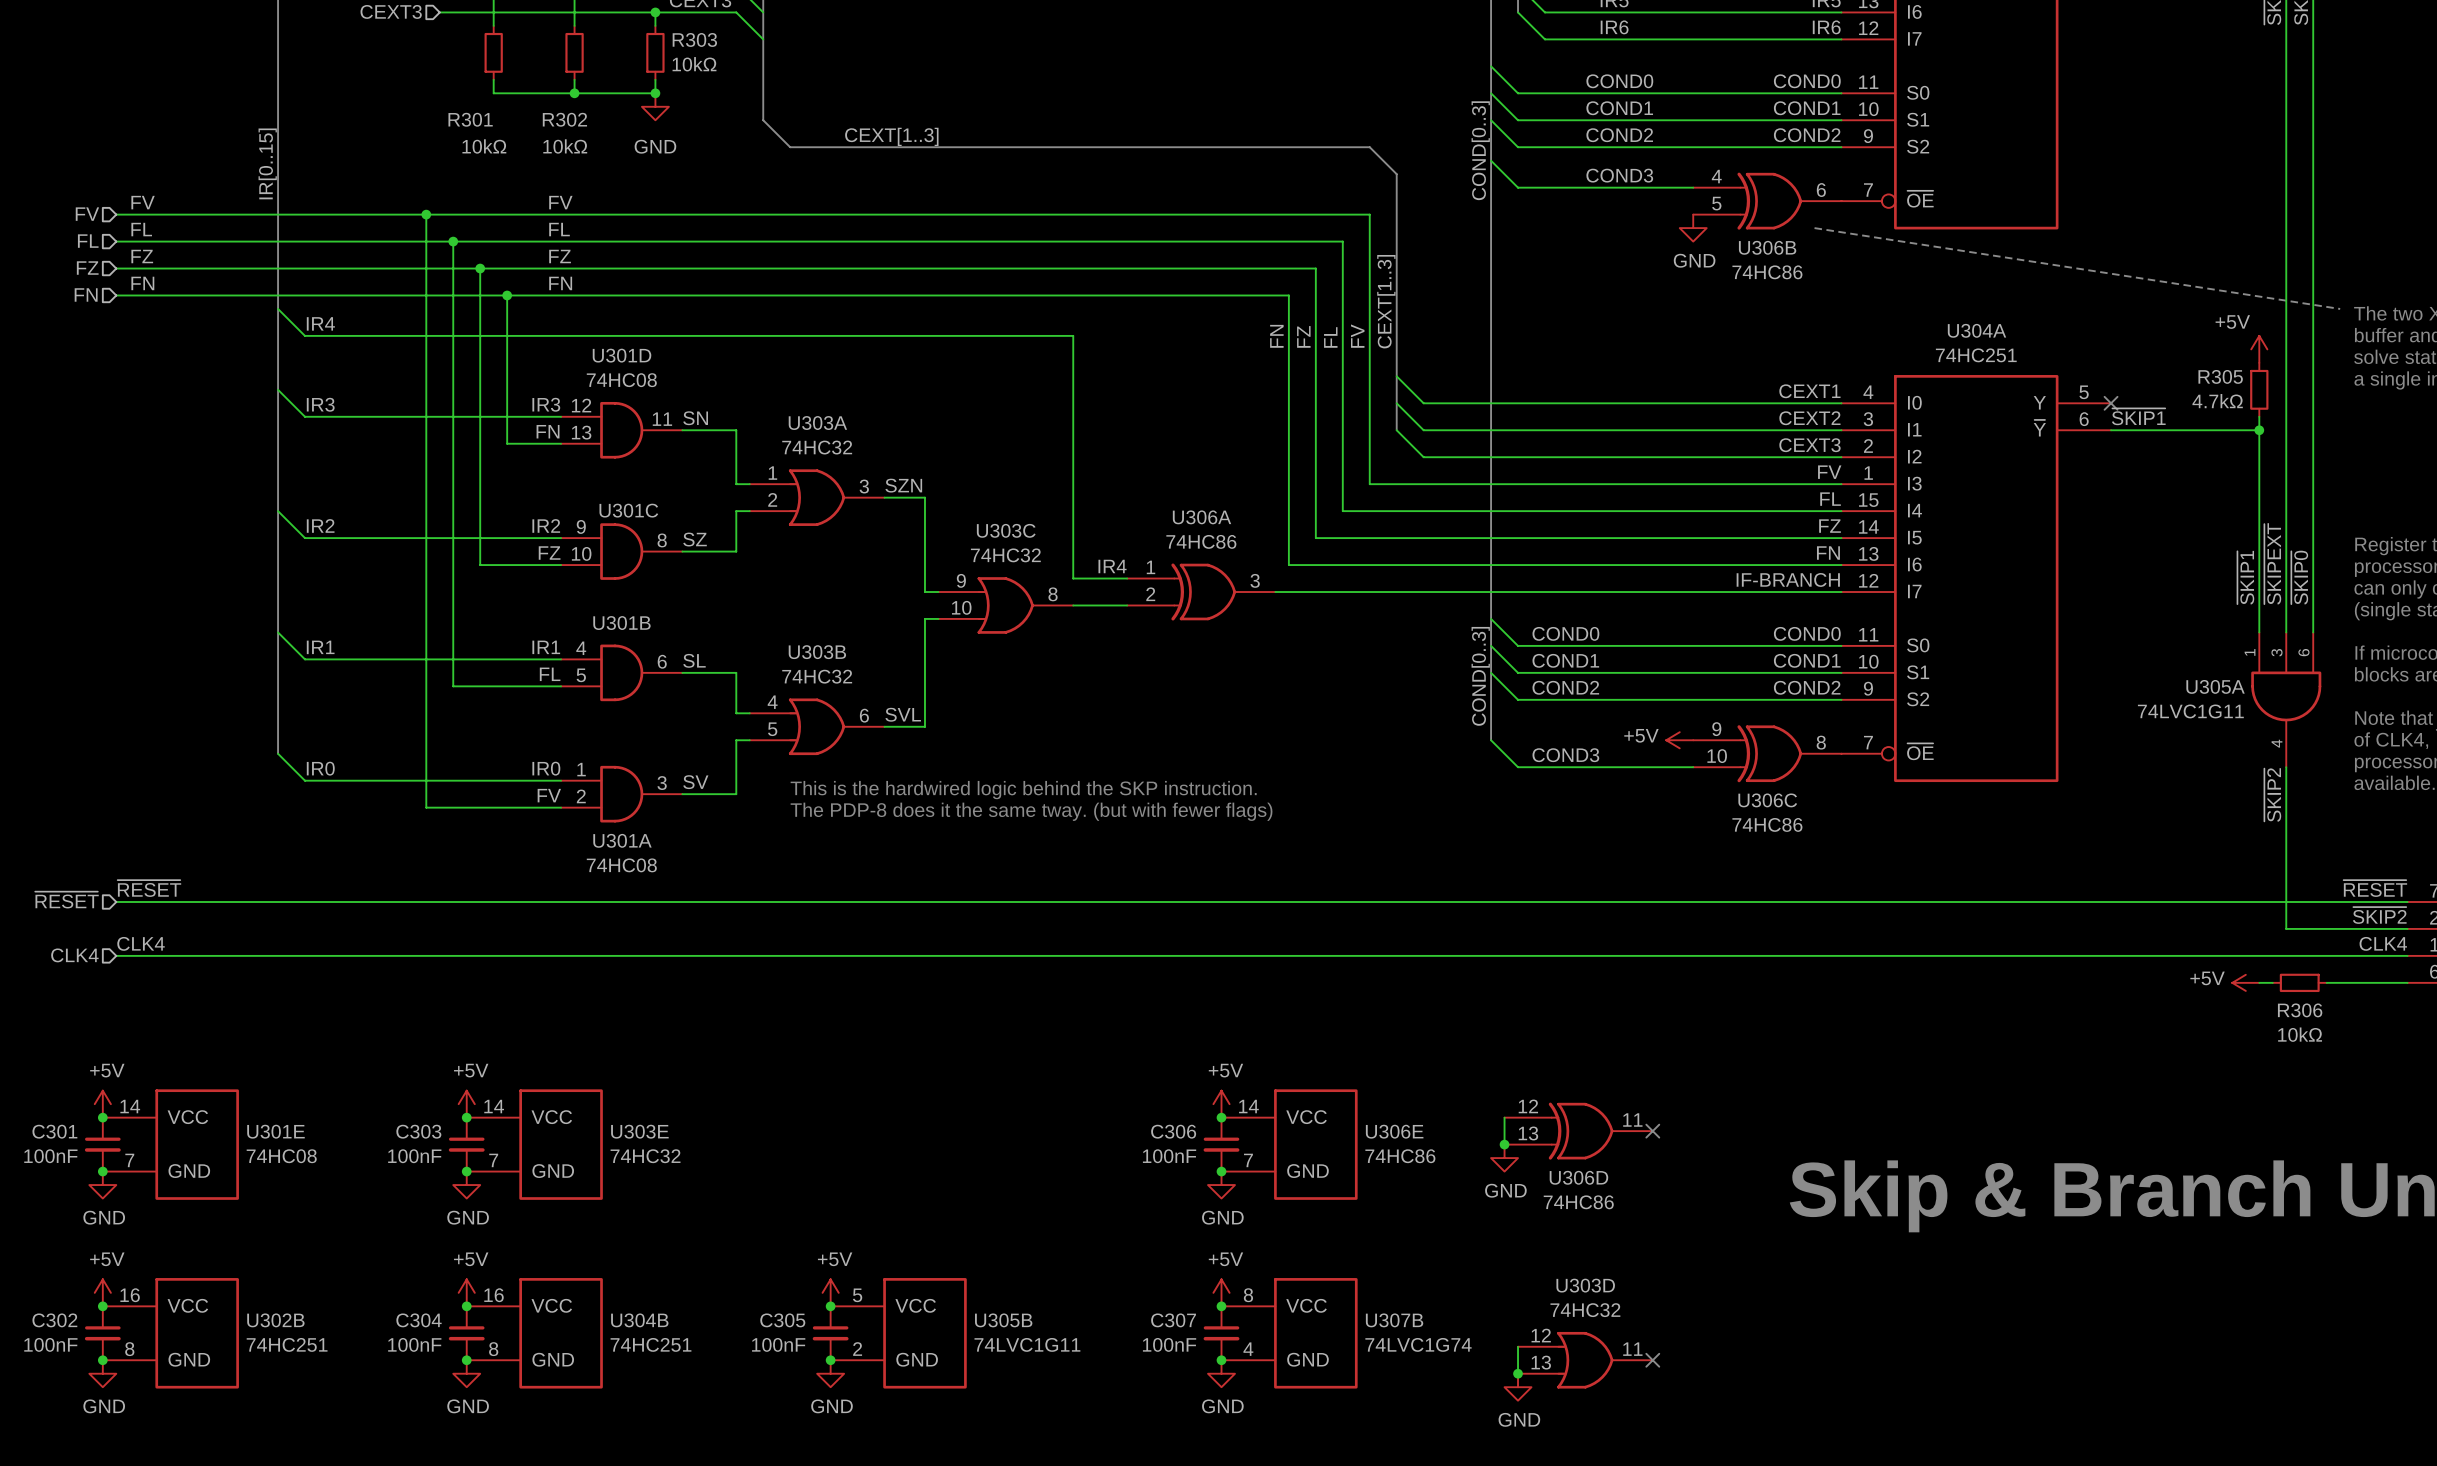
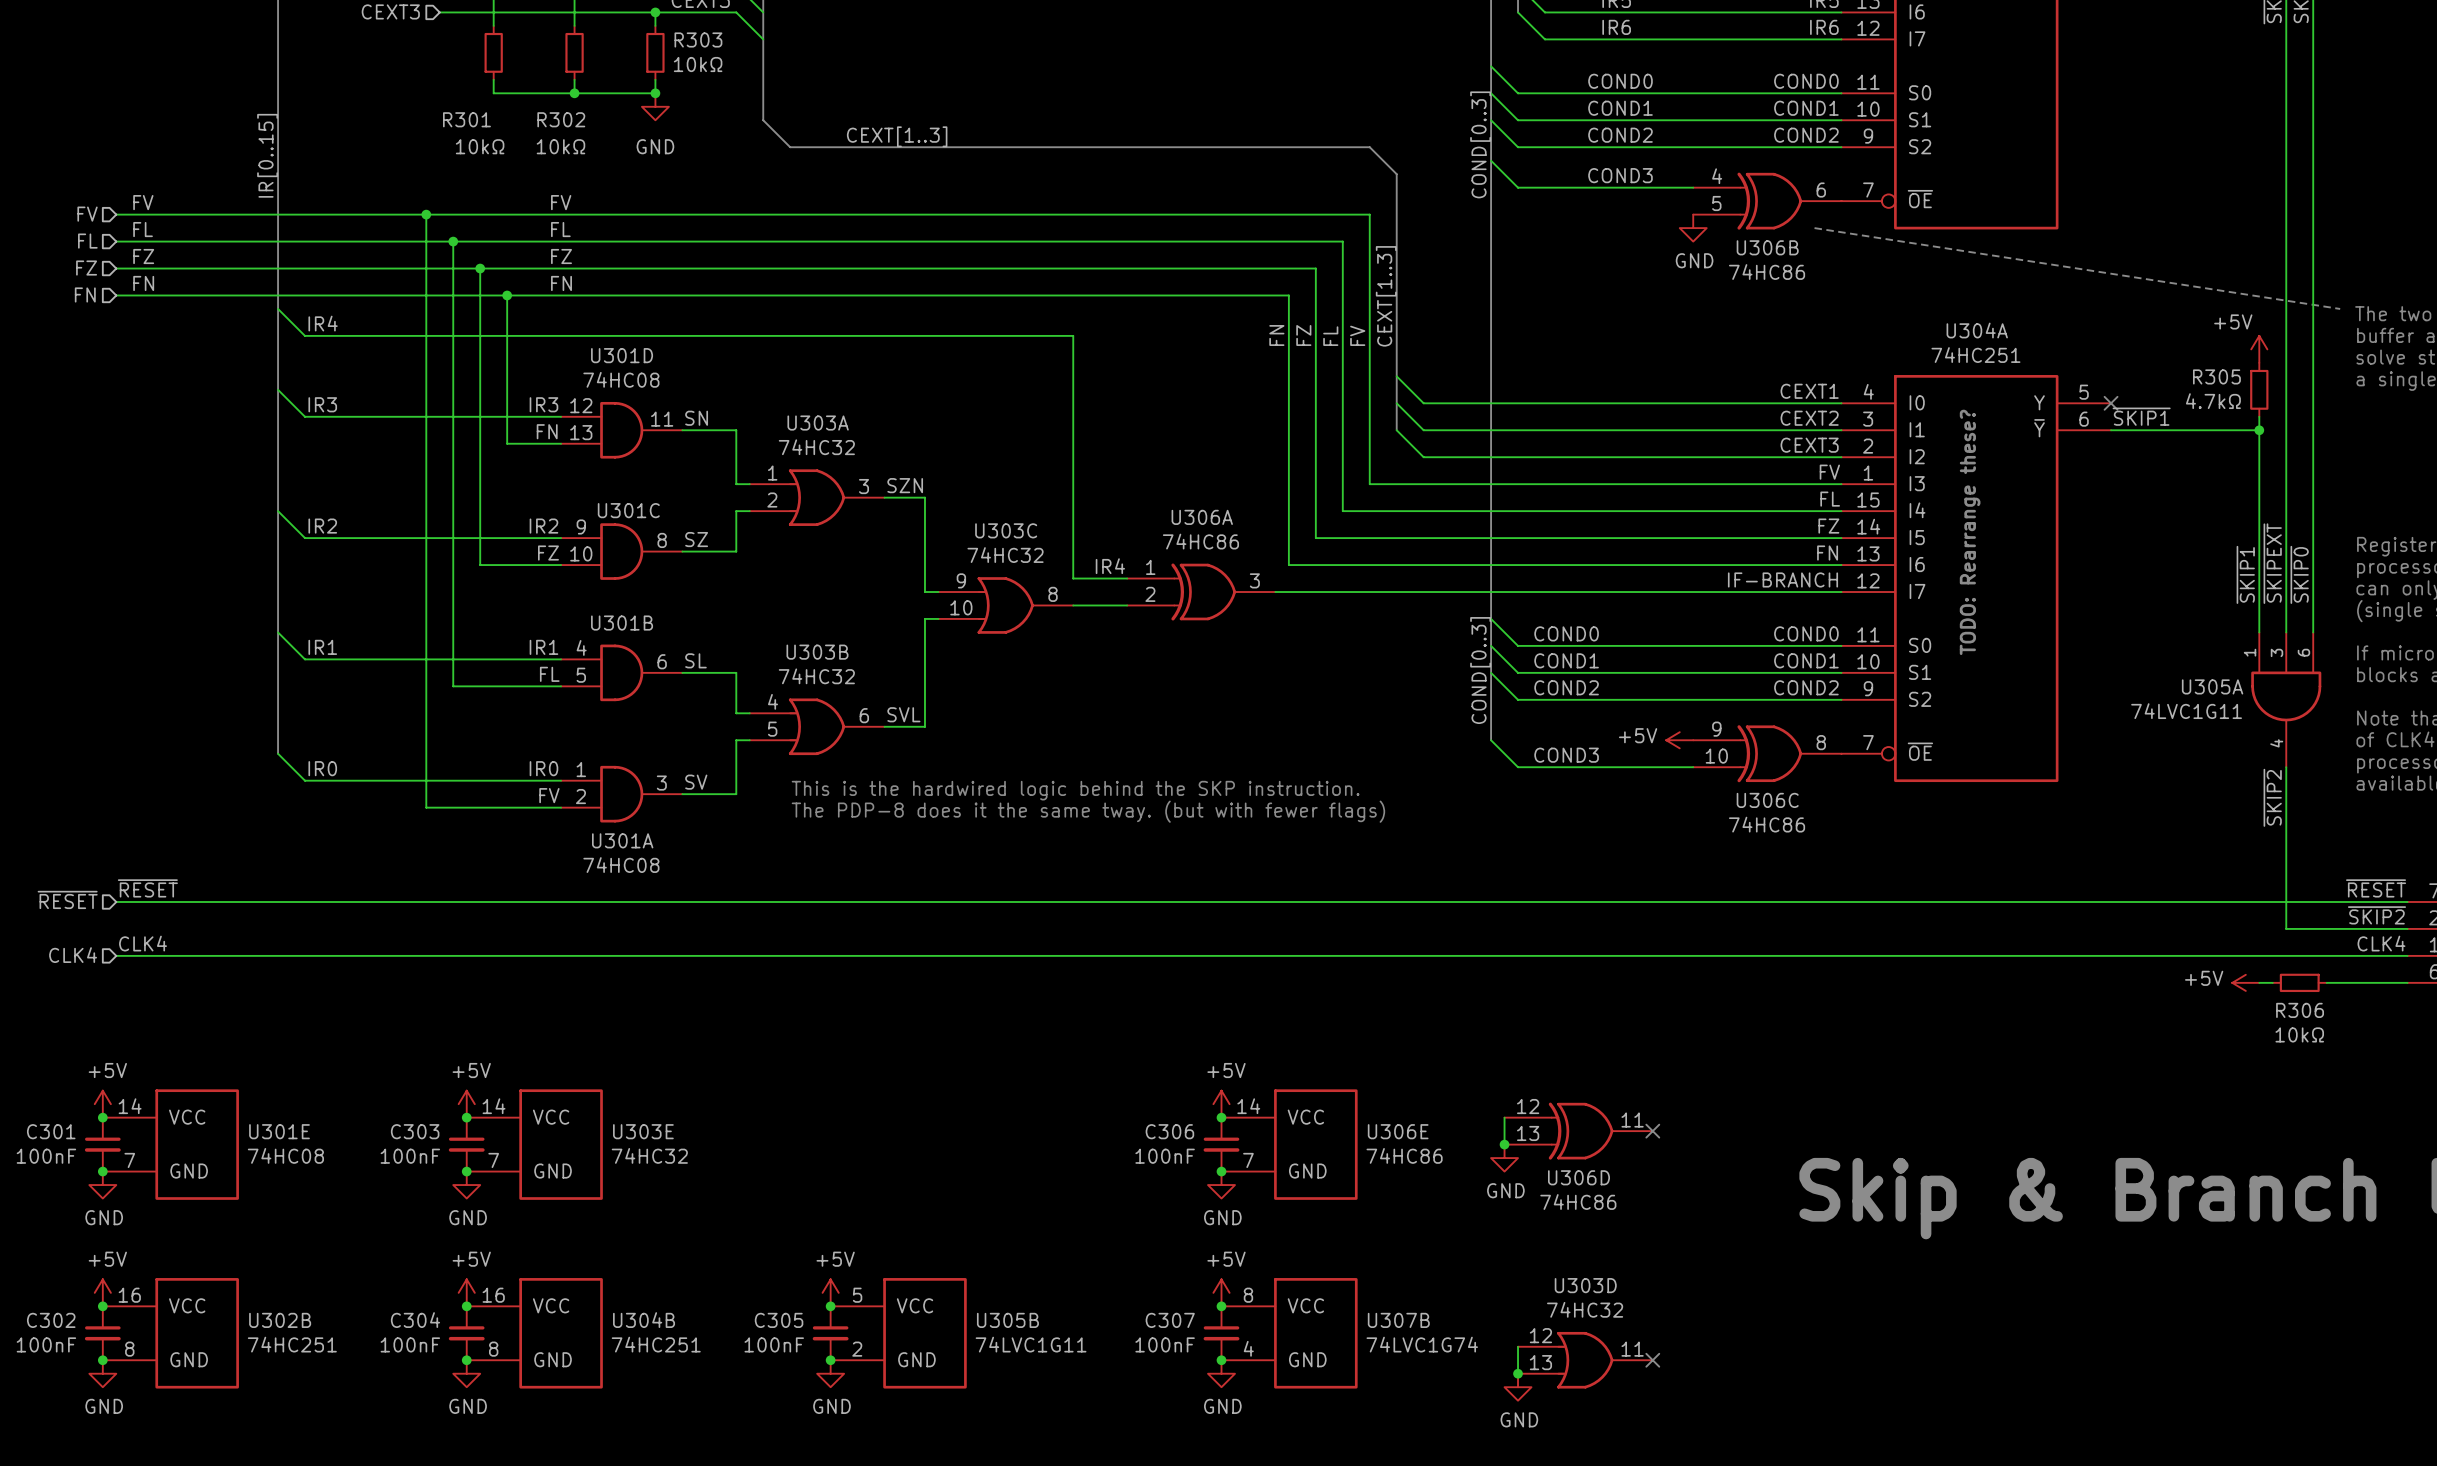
text: none -> TODO: Rearrange these? (1970, 532)

